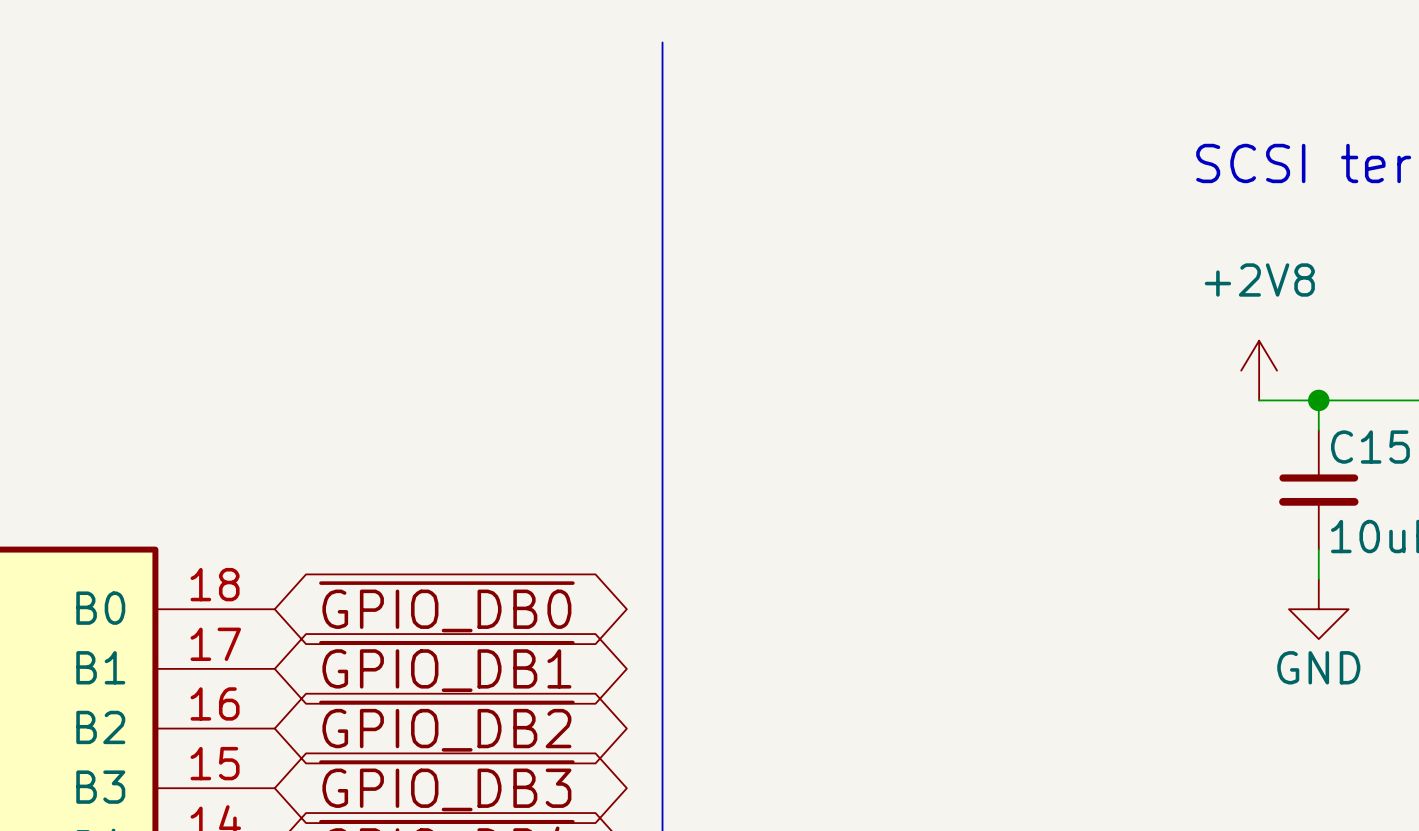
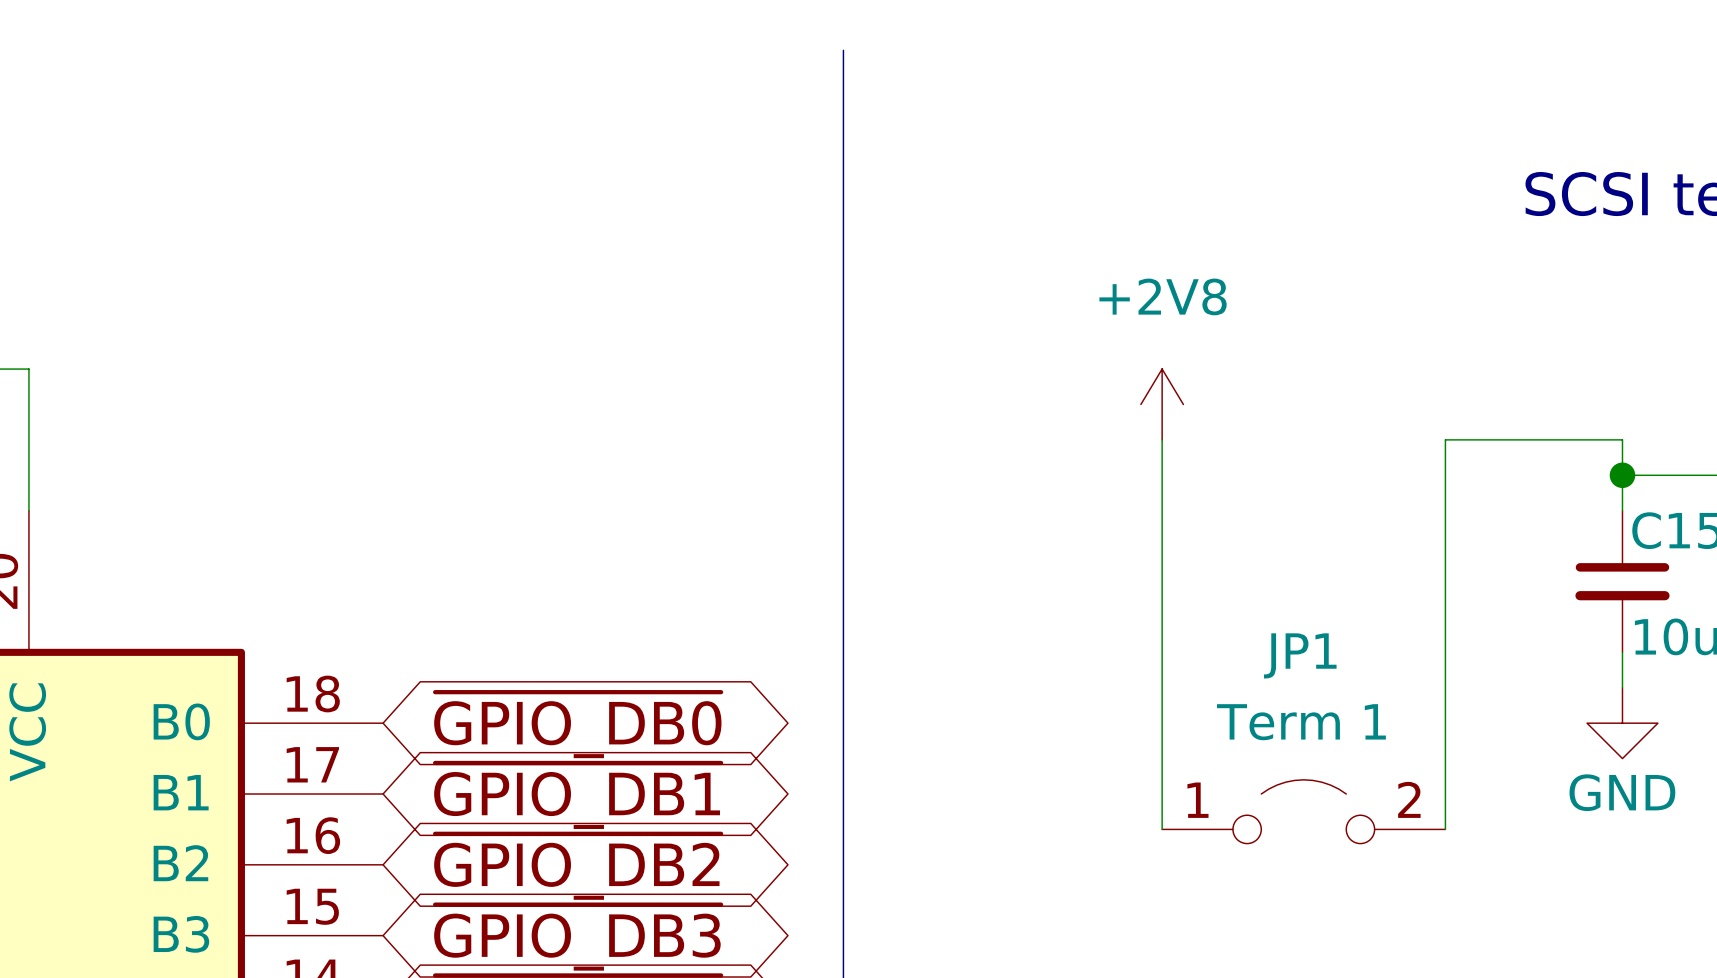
wire: none -> (1162, 439) (1162, 829)
power symbol position: +2V8 (1259, 370) -> +2V8 (1162, 404)
wire: (1259, 400) (1318, 400) -> (1445, 829) (1445, 439) (1622, 439) (1622, 475)
JP1: none -> Term 1 (1303, 811)

